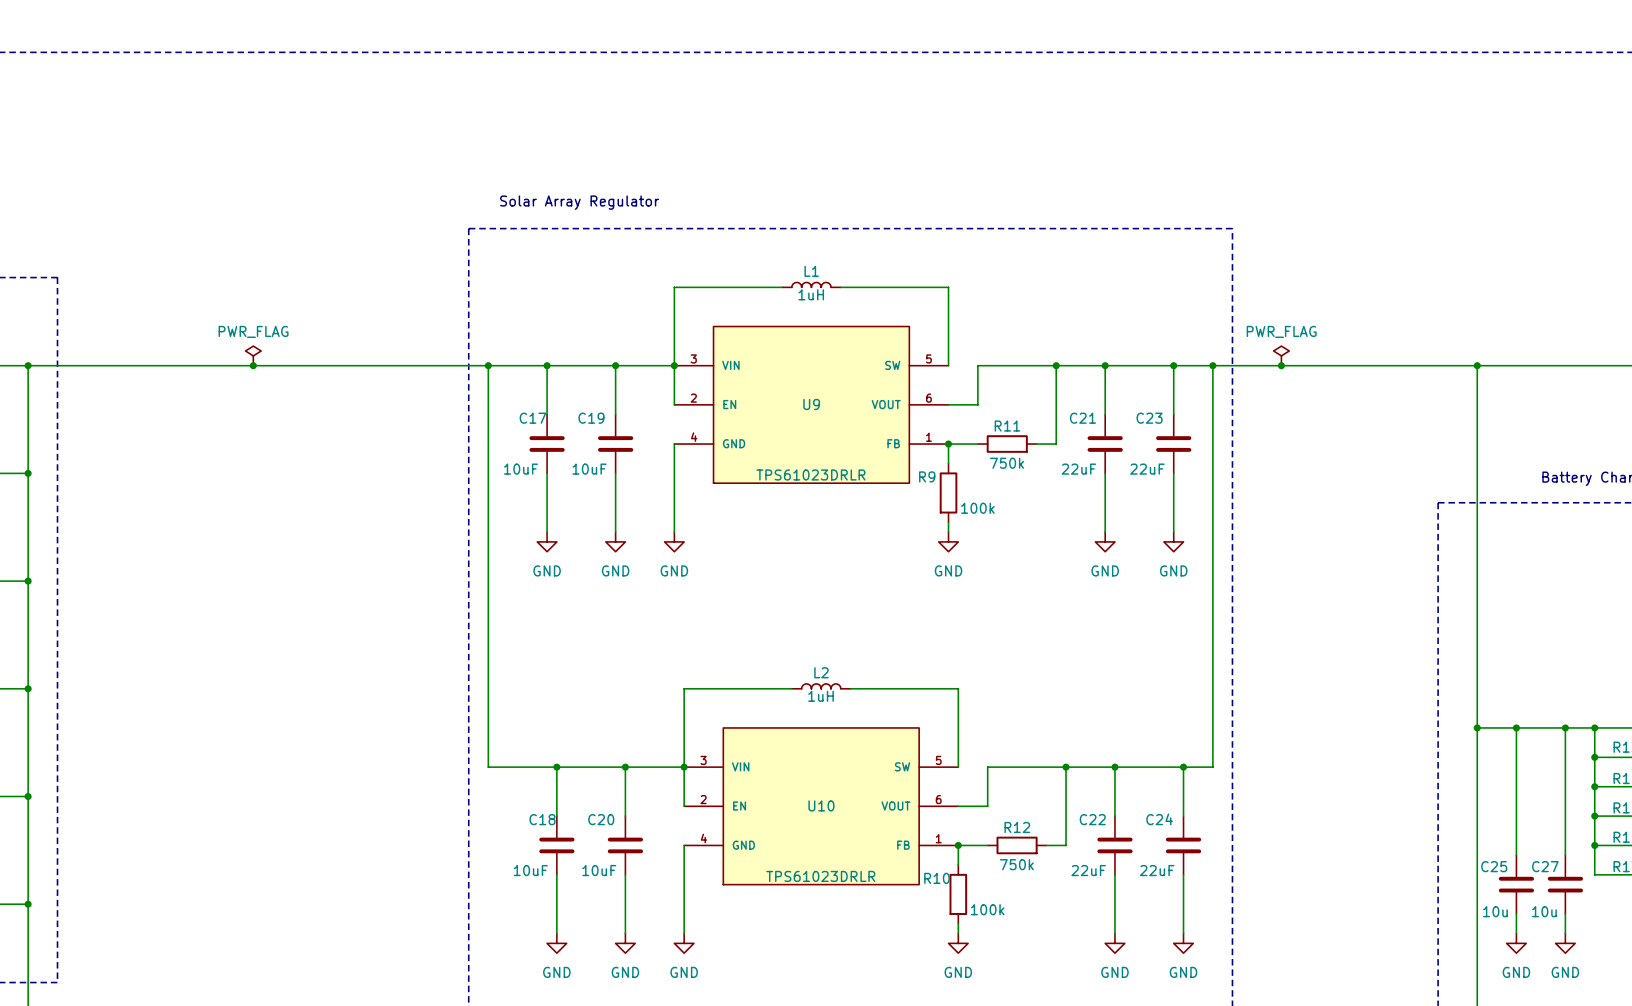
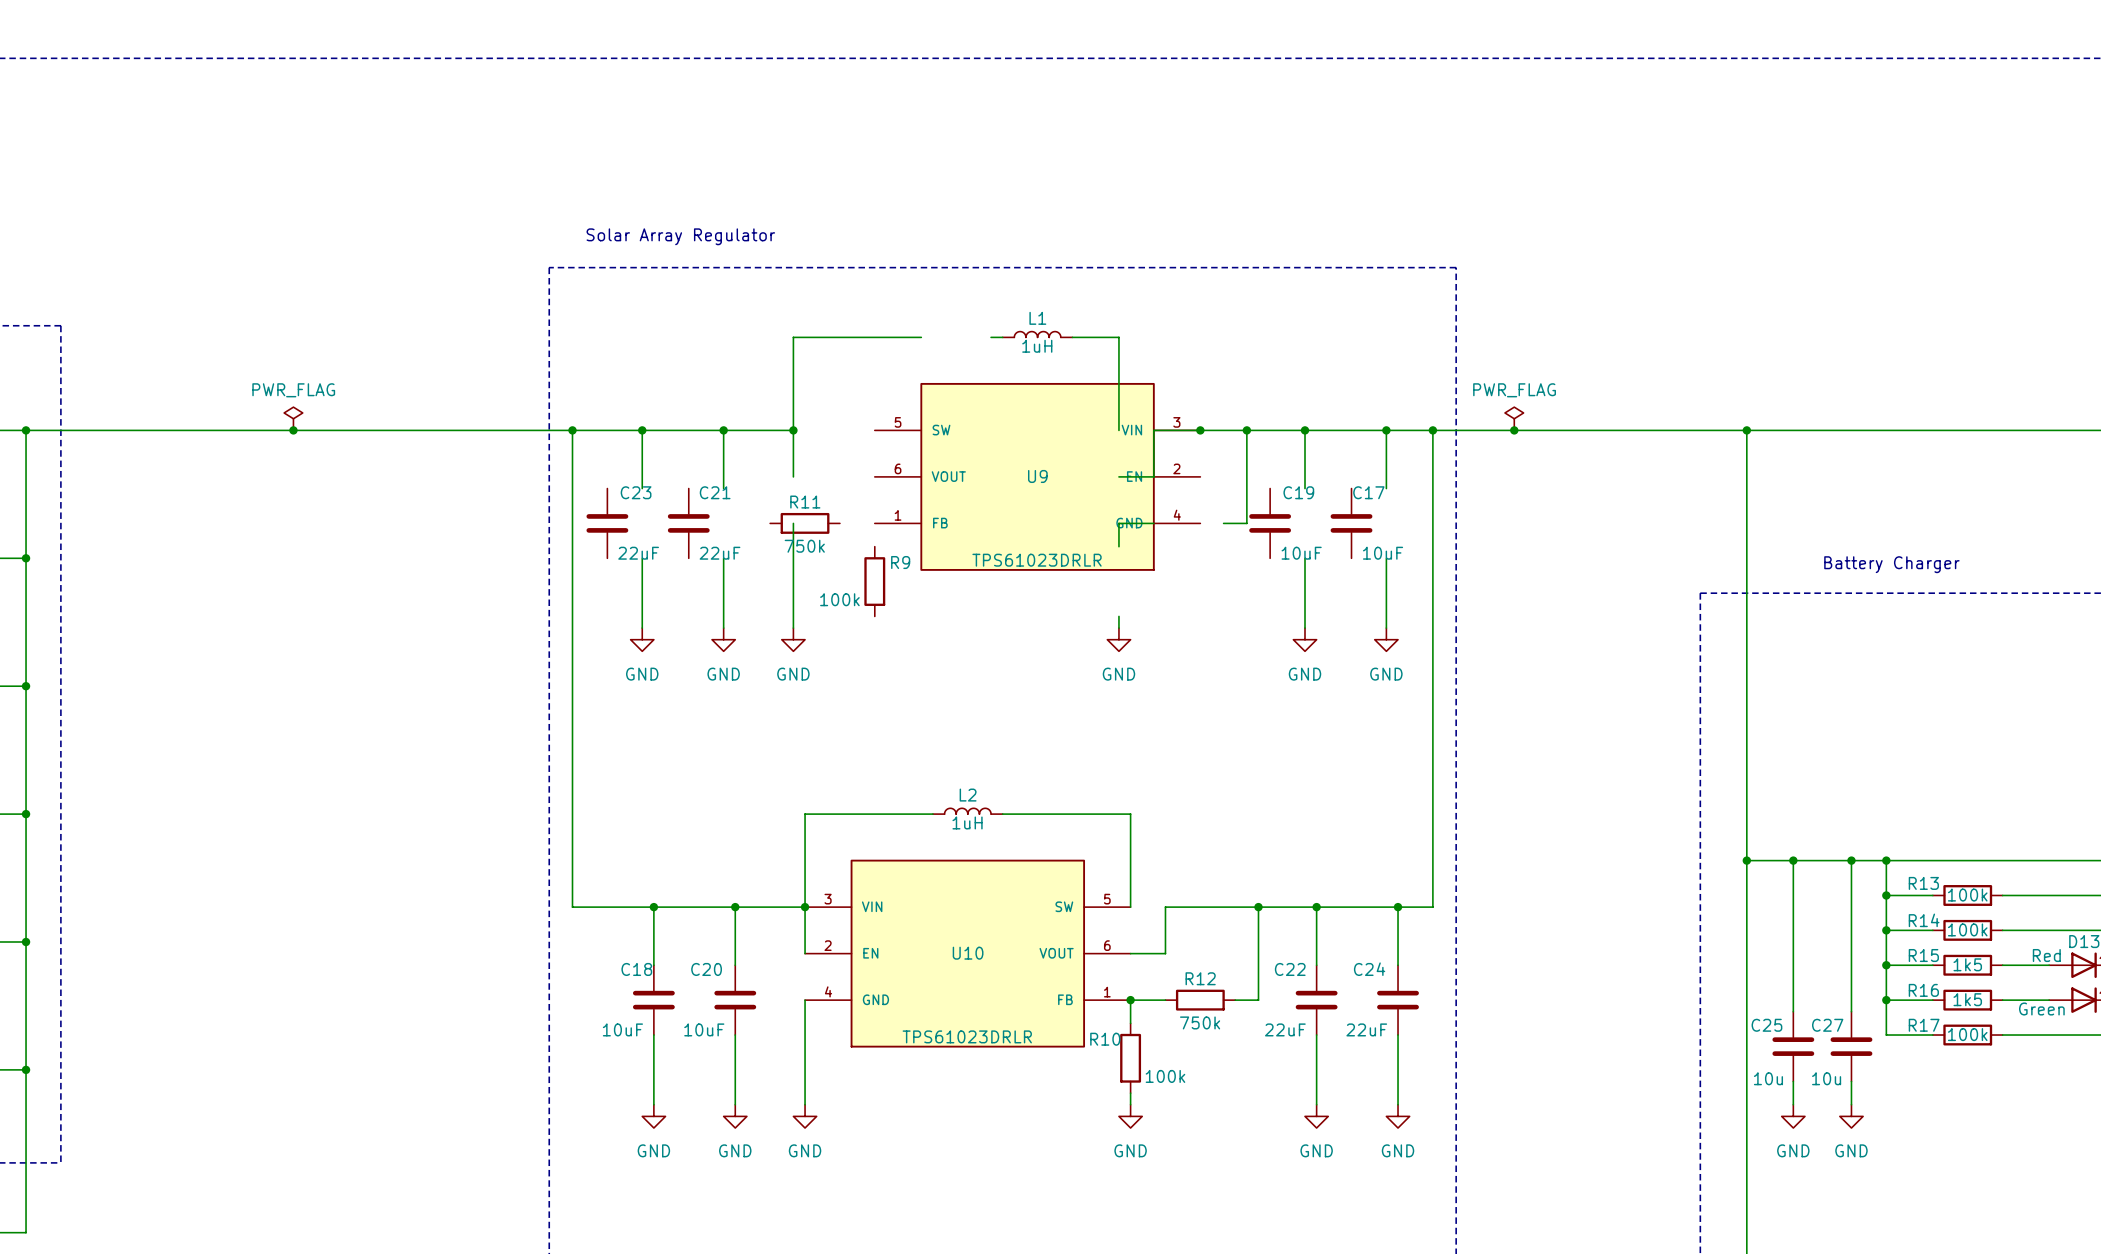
L1 position: (811, 284) -> (1037, 334)
wire: (850, 287) (909, 287) -> none
junction: none -> (1200, 430)
U9 flip: as is (811, 404) -> left-right (1037, 476)
C17 name position: C17 (532, 418) -> C17 (1368, 492)
C19 name position: C19 (591, 418) -> C19 (1298, 492)
C21 name position: C21 (1082, 418) -> C21 (715, 492)
C23 name position: C23 (1149, 418) -> C23 (636, 492)
C17 position: (547, 444) -> (1351, 523)
C19 position: (615, 444) -> (1270, 523)
junction: (948, 444) -> none
R11 position: (1007, 444) -> (805, 523)
C21 position: (1105, 444) -> (688, 523)
C23 position: (1173, 444) -> (607, 523)
C17 value position: 10uF (520, 469) -> 10uF (1383, 553)
C19 value position: 10uF (589, 469) -> 10uF (1301, 553)
C21 value position: 22uF (1078, 469) -> 22uF (720, 553)
C23 value position: 22uF (1147, 469) -> 22uF (638, 553)
R9 name position: R9 (927, 476) -> R9 (900, 562)
R9 position: (948, 492) -> (874, 581)
R9 value position: 100k (977, 508) -> 100k (839, 599)

